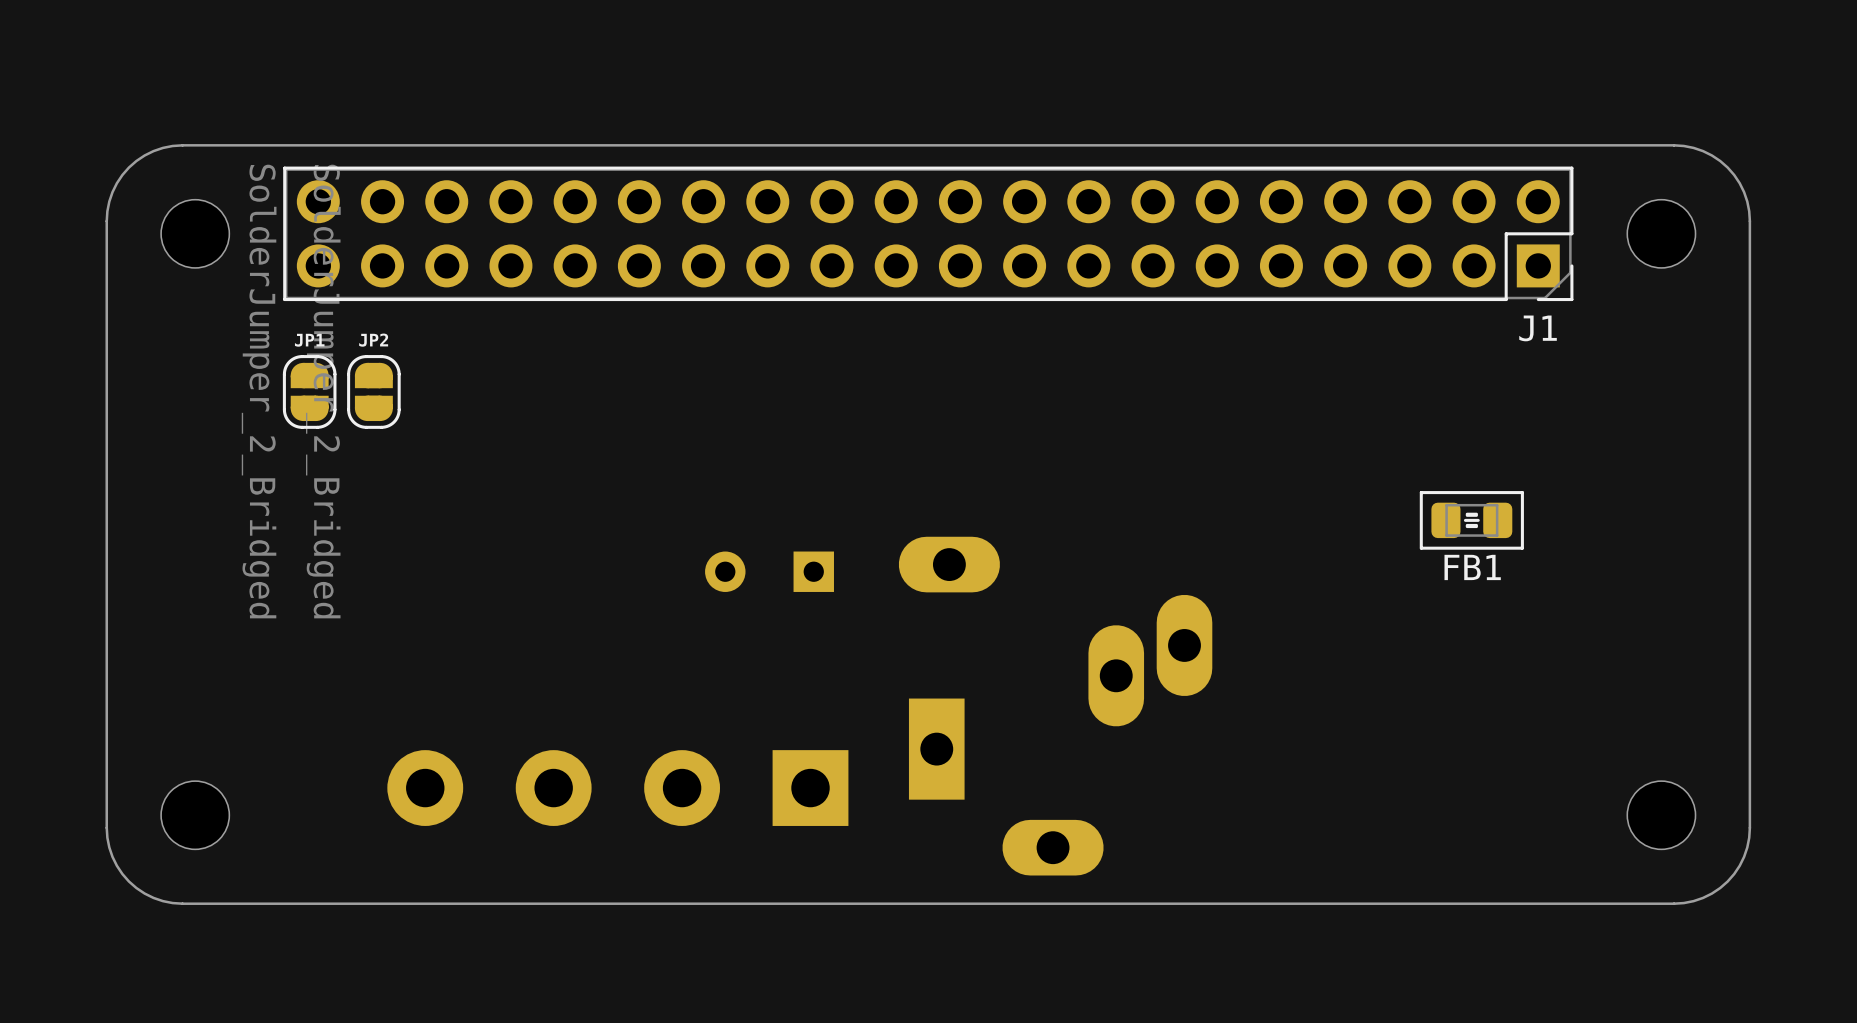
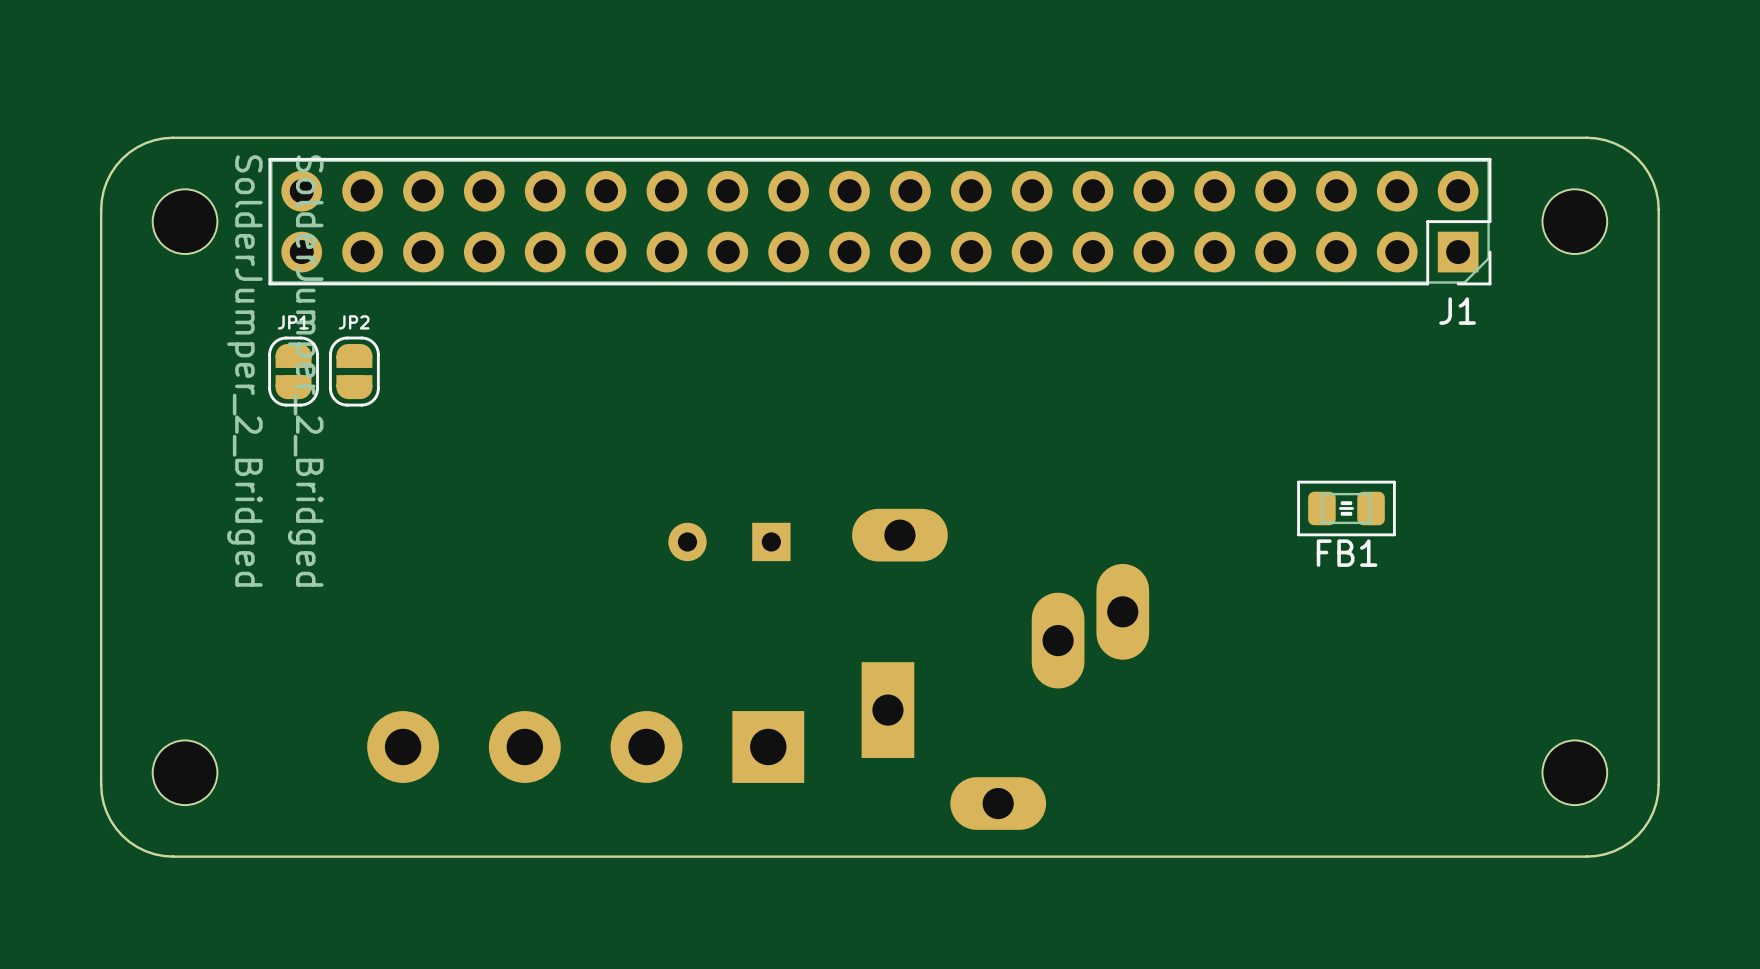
FB1 position: (1471, 520) -> (1346, 508)

